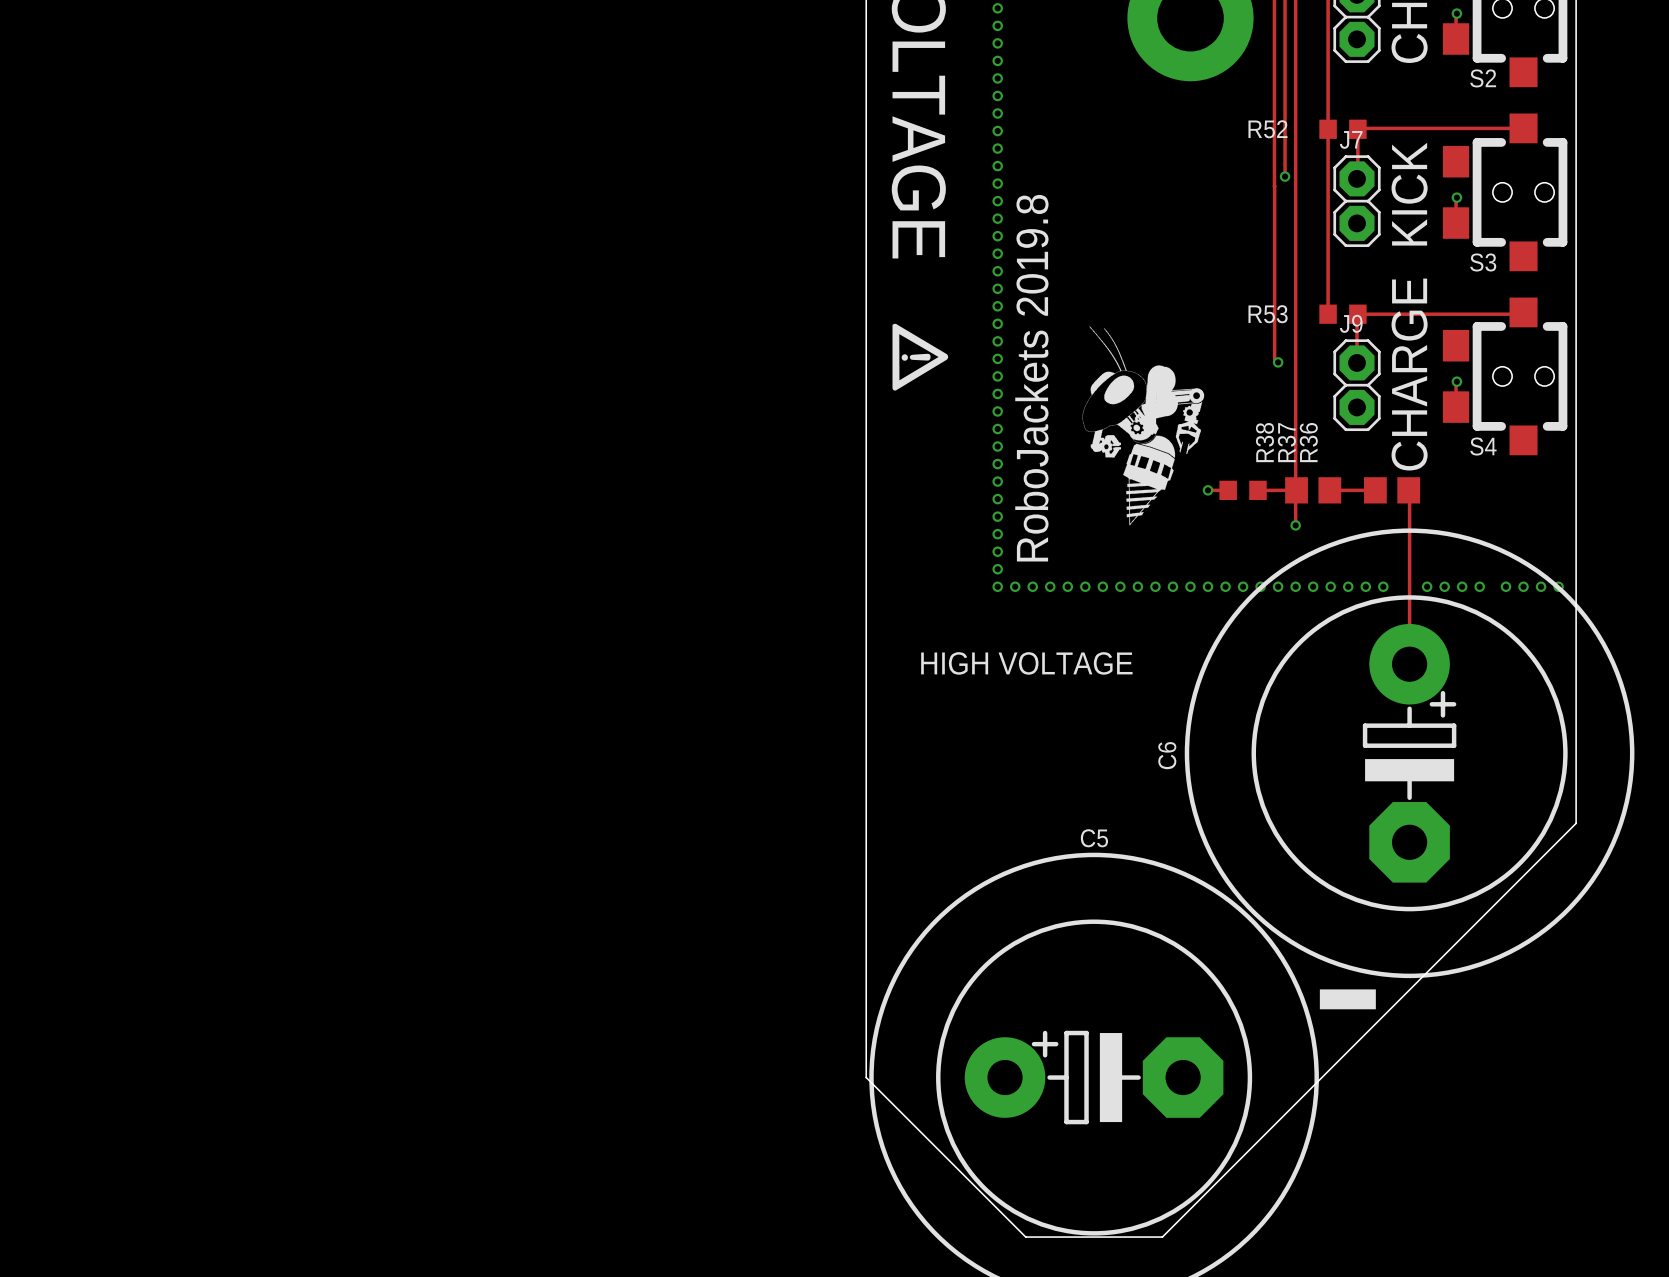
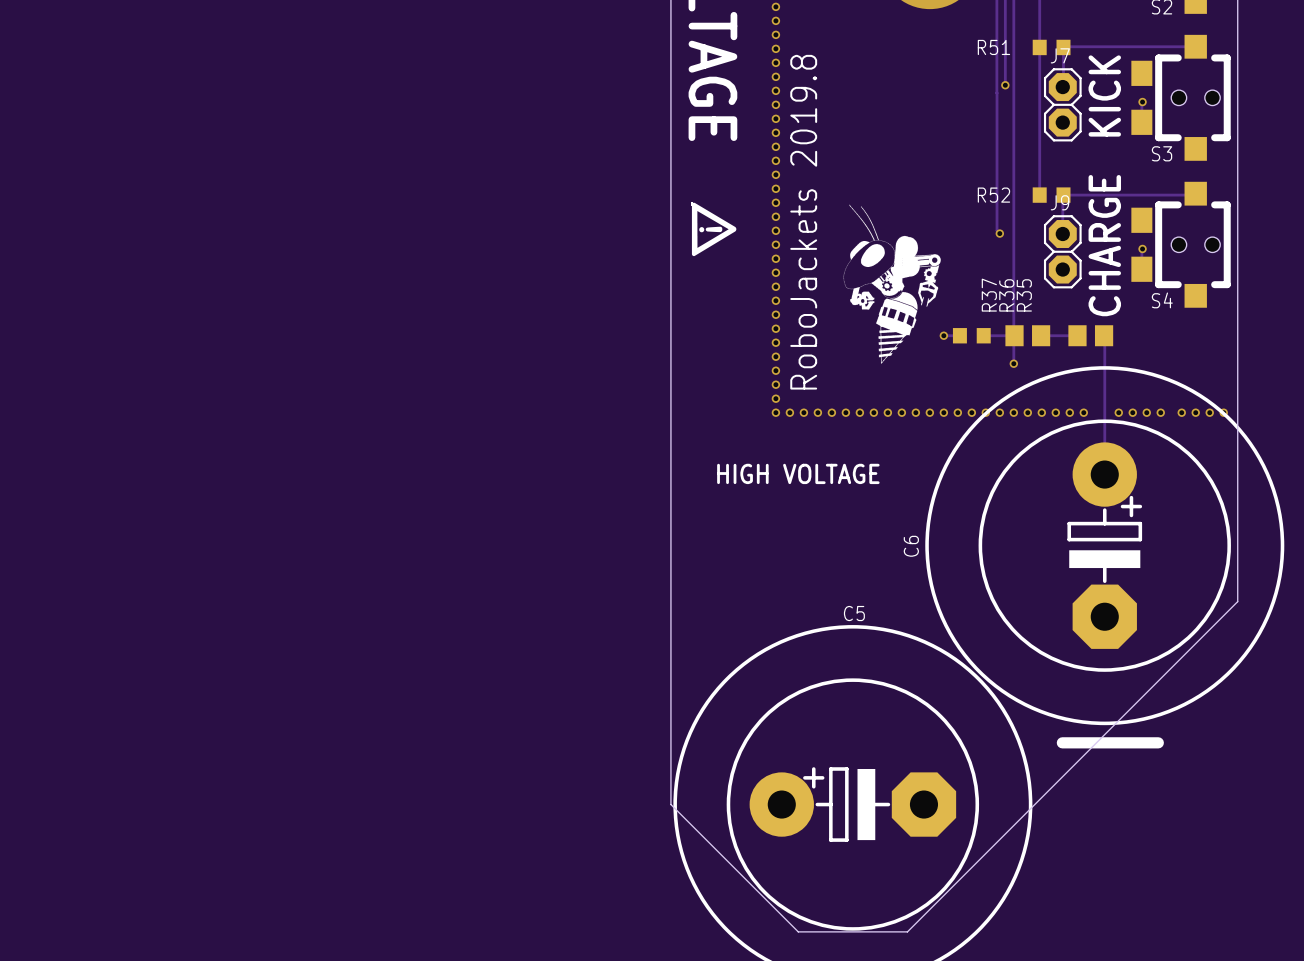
R52 name: R52 (1267, 129) -> R51 (993, 47)
R53 name: R53 (1268, 314) -> R52 (993, 195)
R38 name: R38 (1264, 442) -> R37 (989, 295)
R37 name: R37 (1286, 442) -> R36 (1006, 295)
R36 name: R36 (1308, 442) -> R35 (1024, 295)

